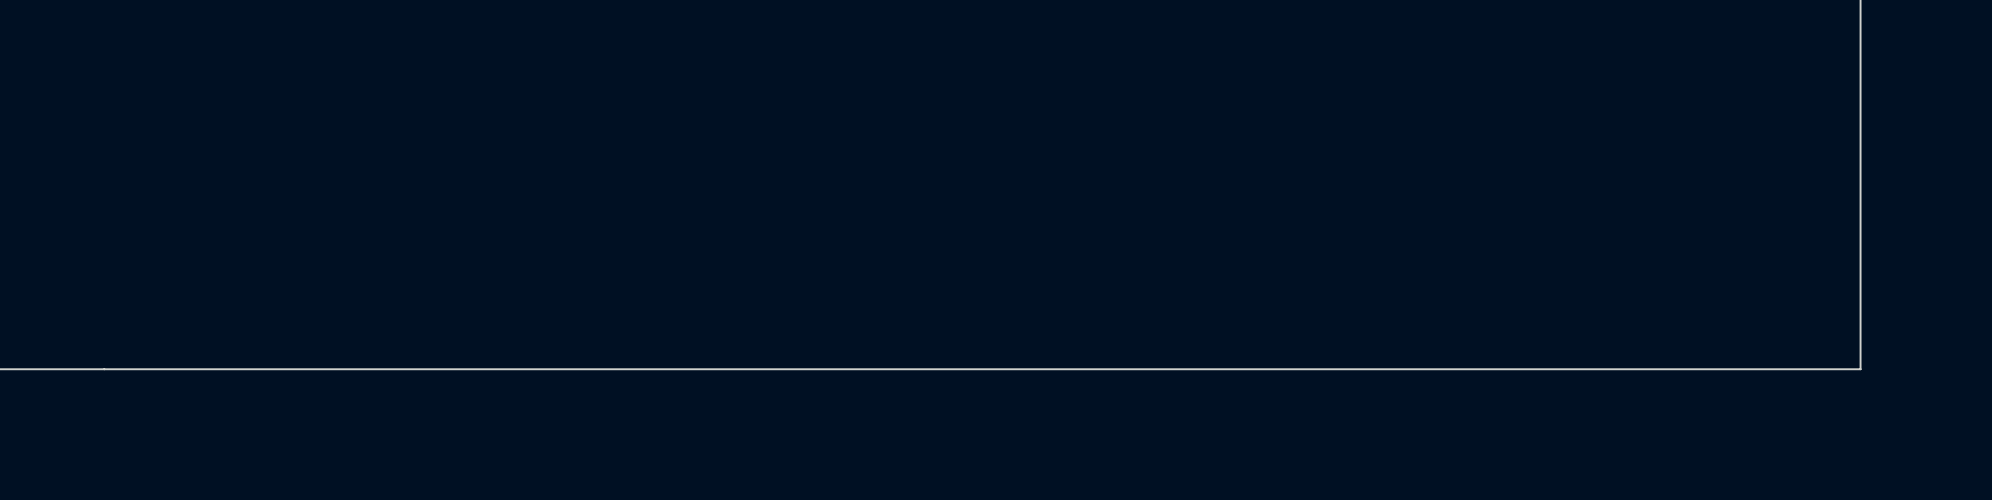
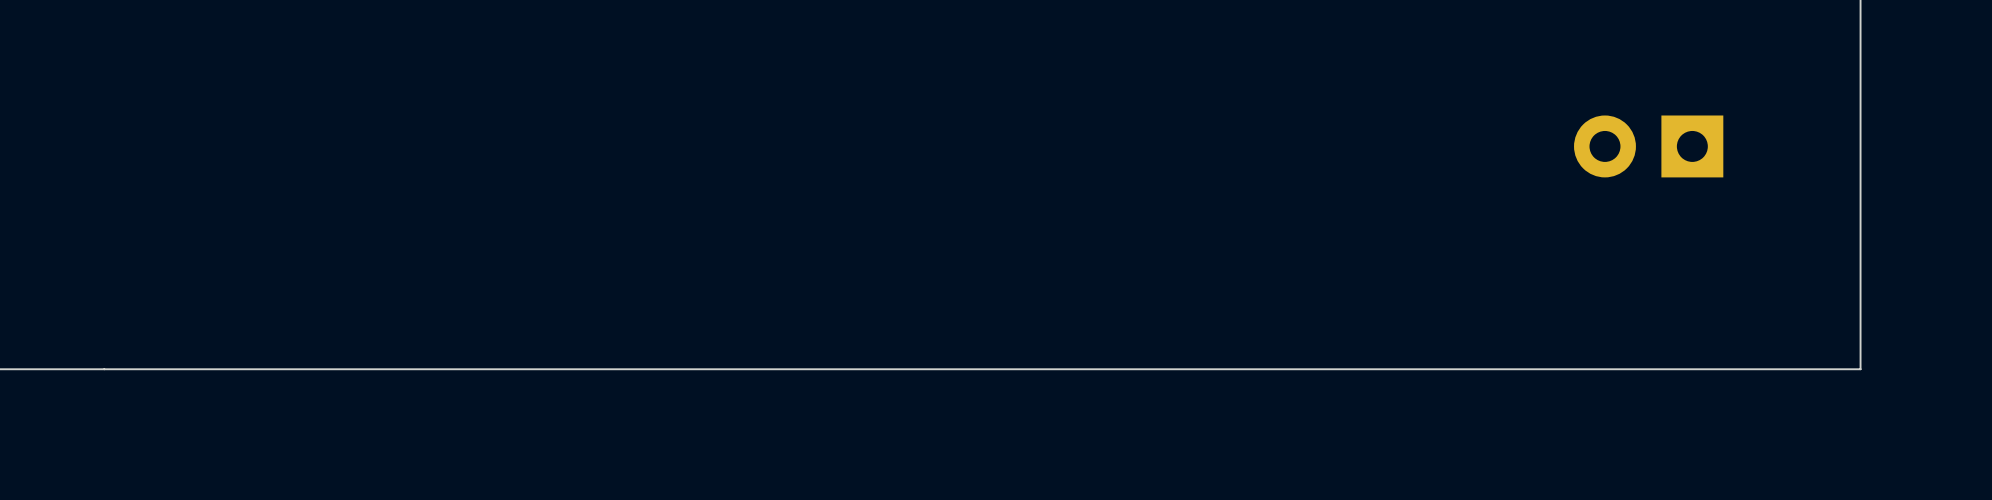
part: none -> (1648, 146)

